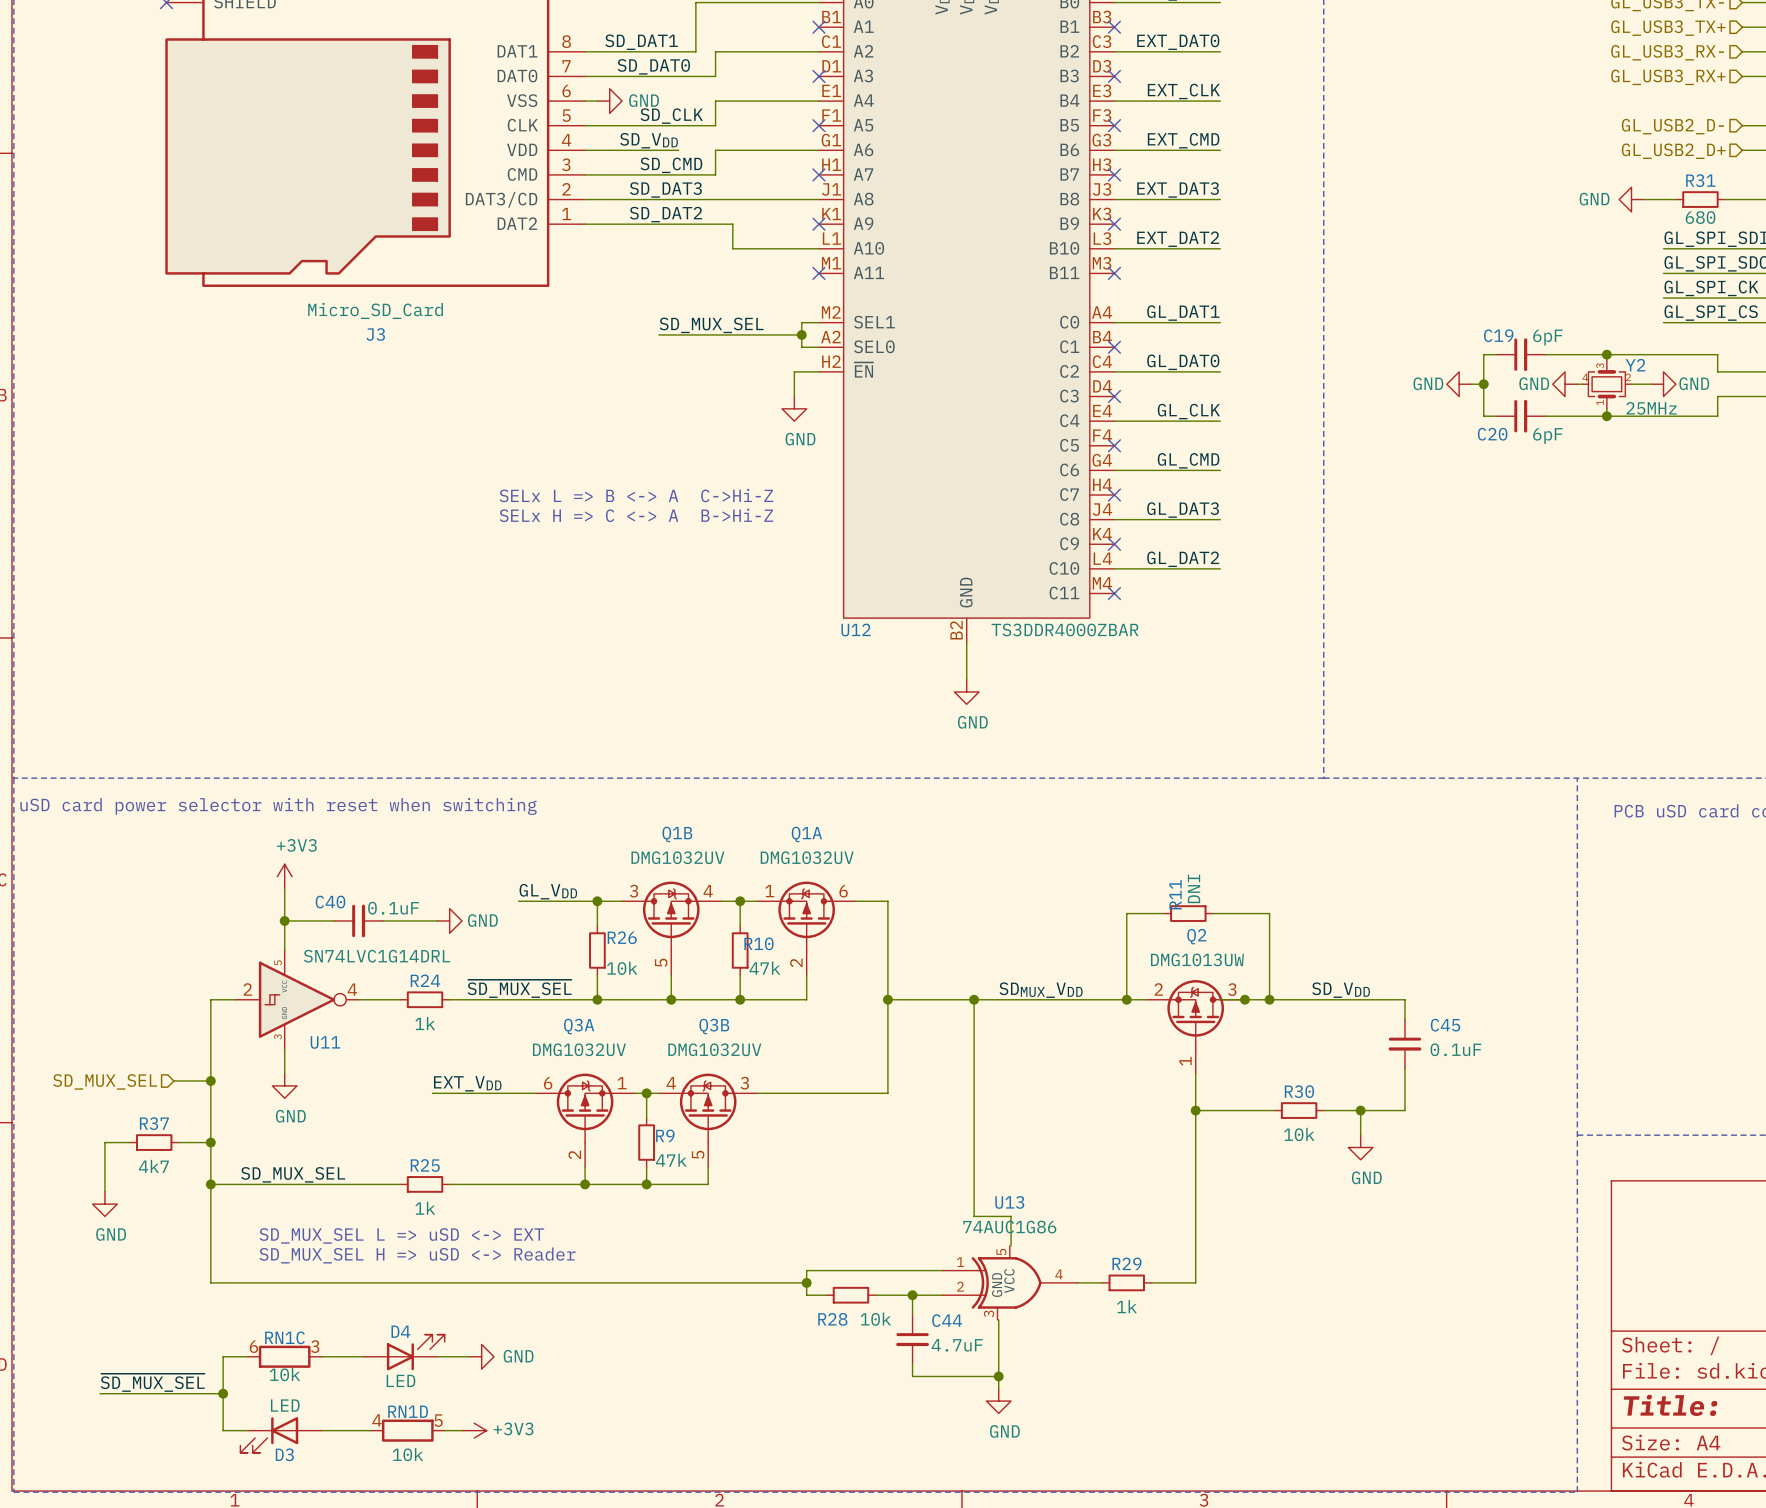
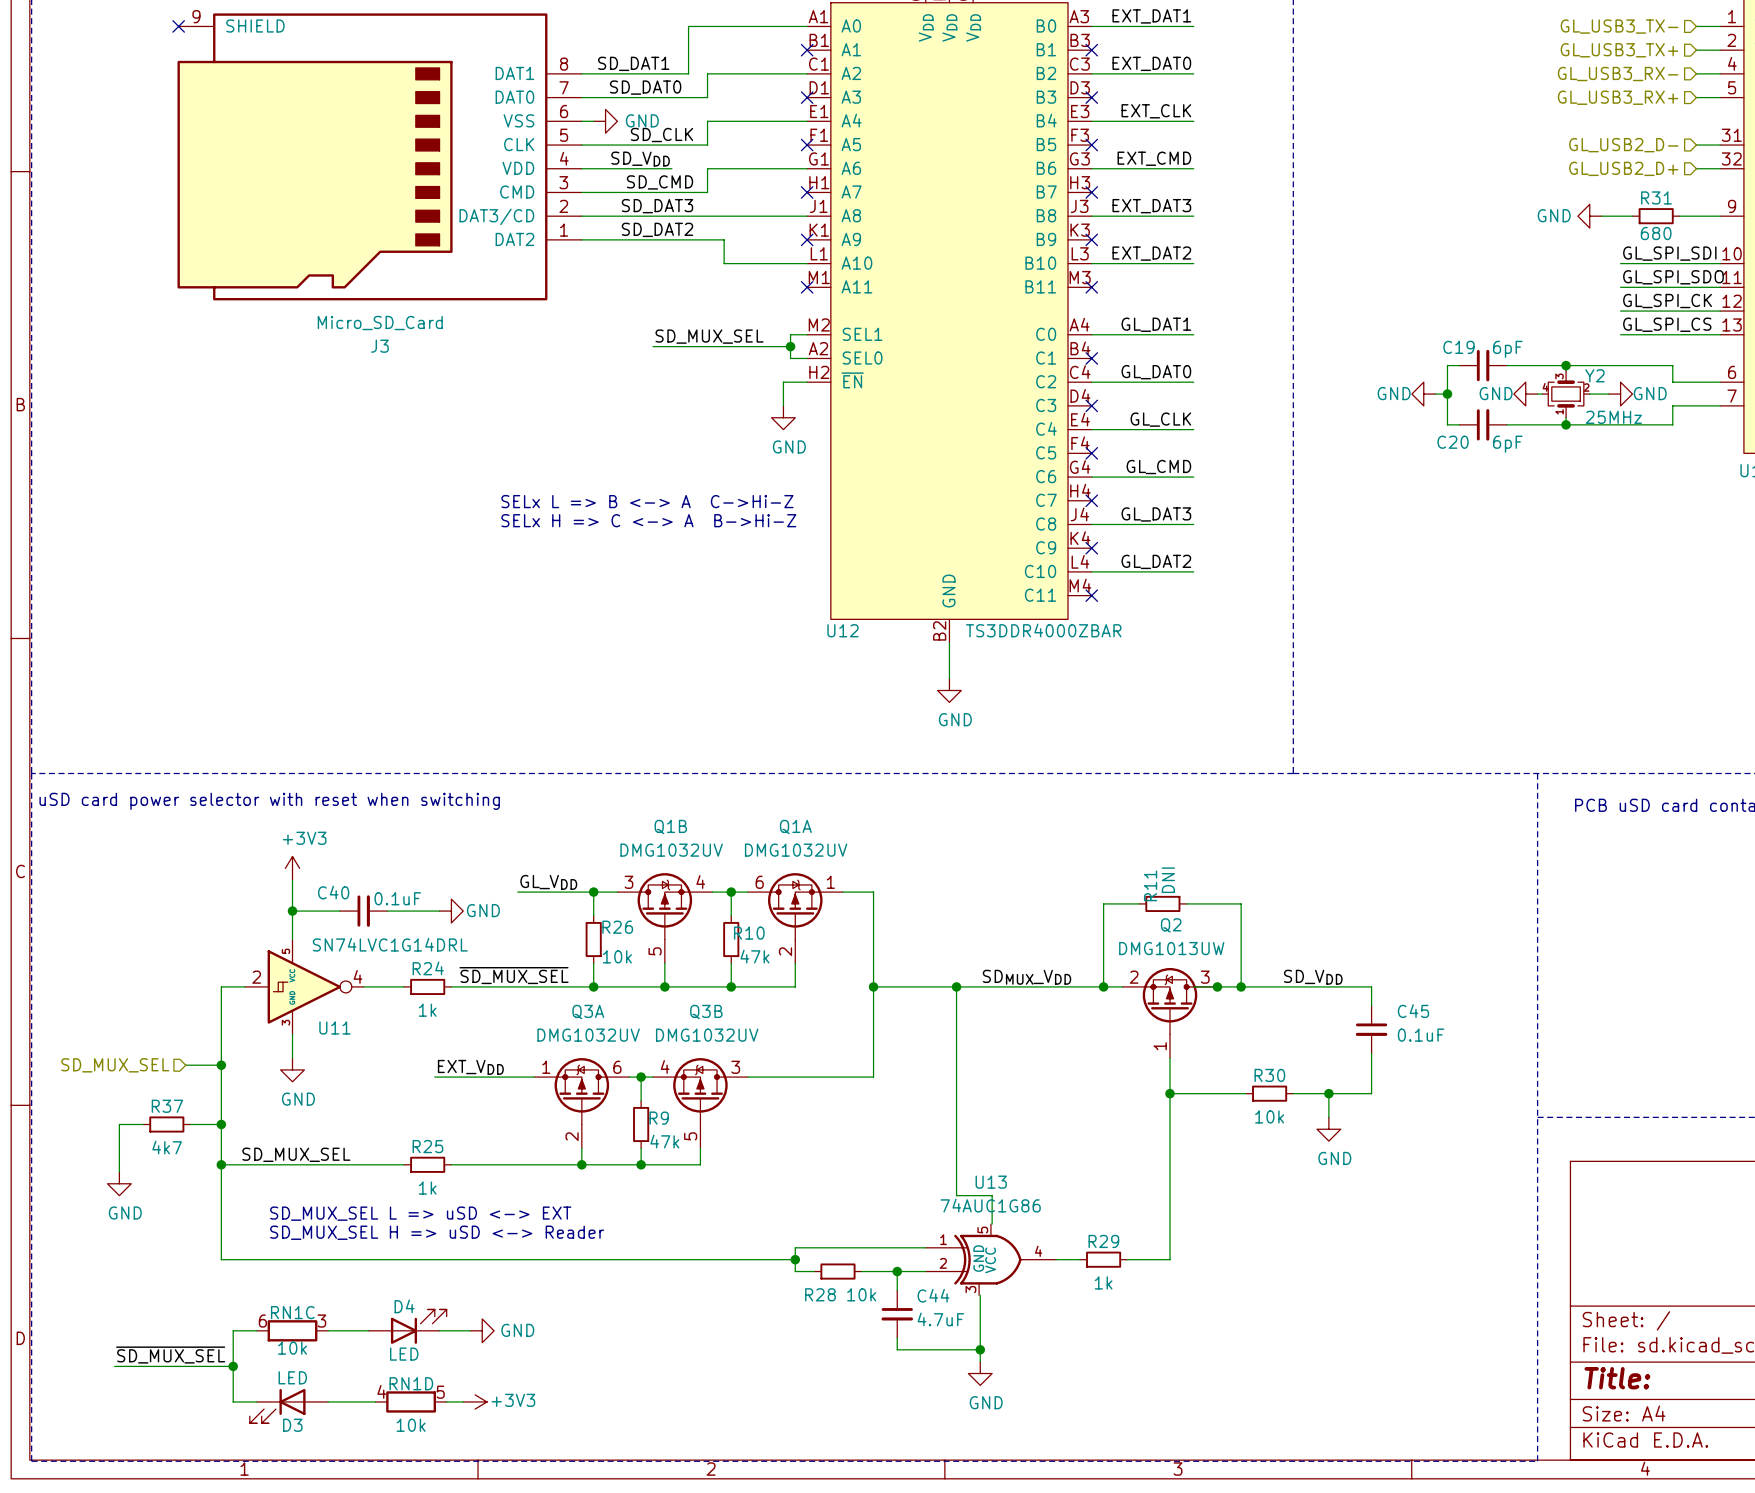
Q1A flip: as is (806, 916) -> left-right (795, 906)
Q3A flip: as is (585, 1108) -> left-right (581, 1091)

